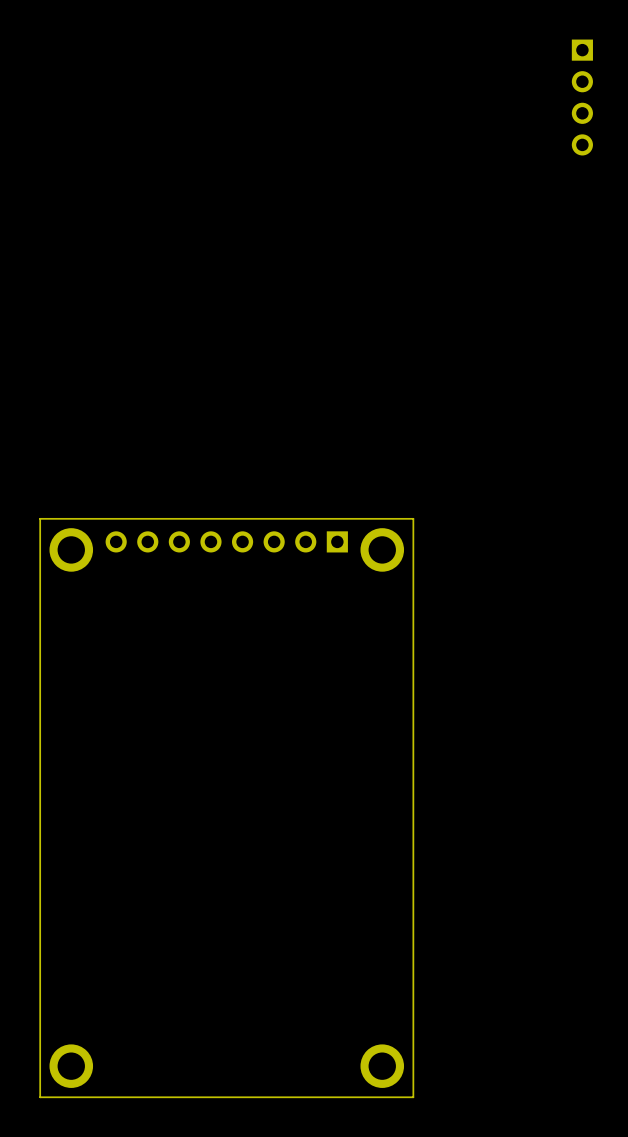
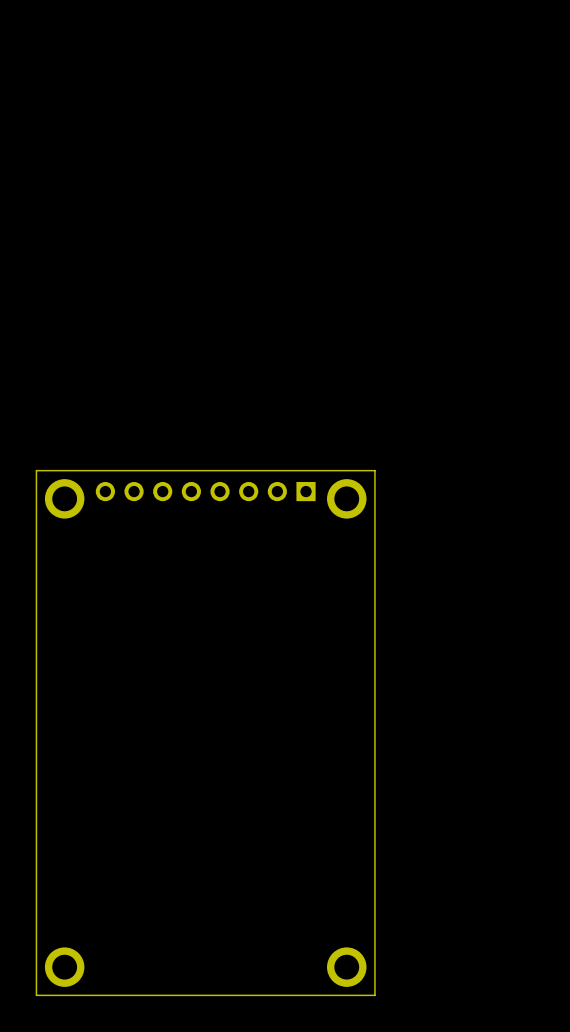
part: (582, 97) -> none

